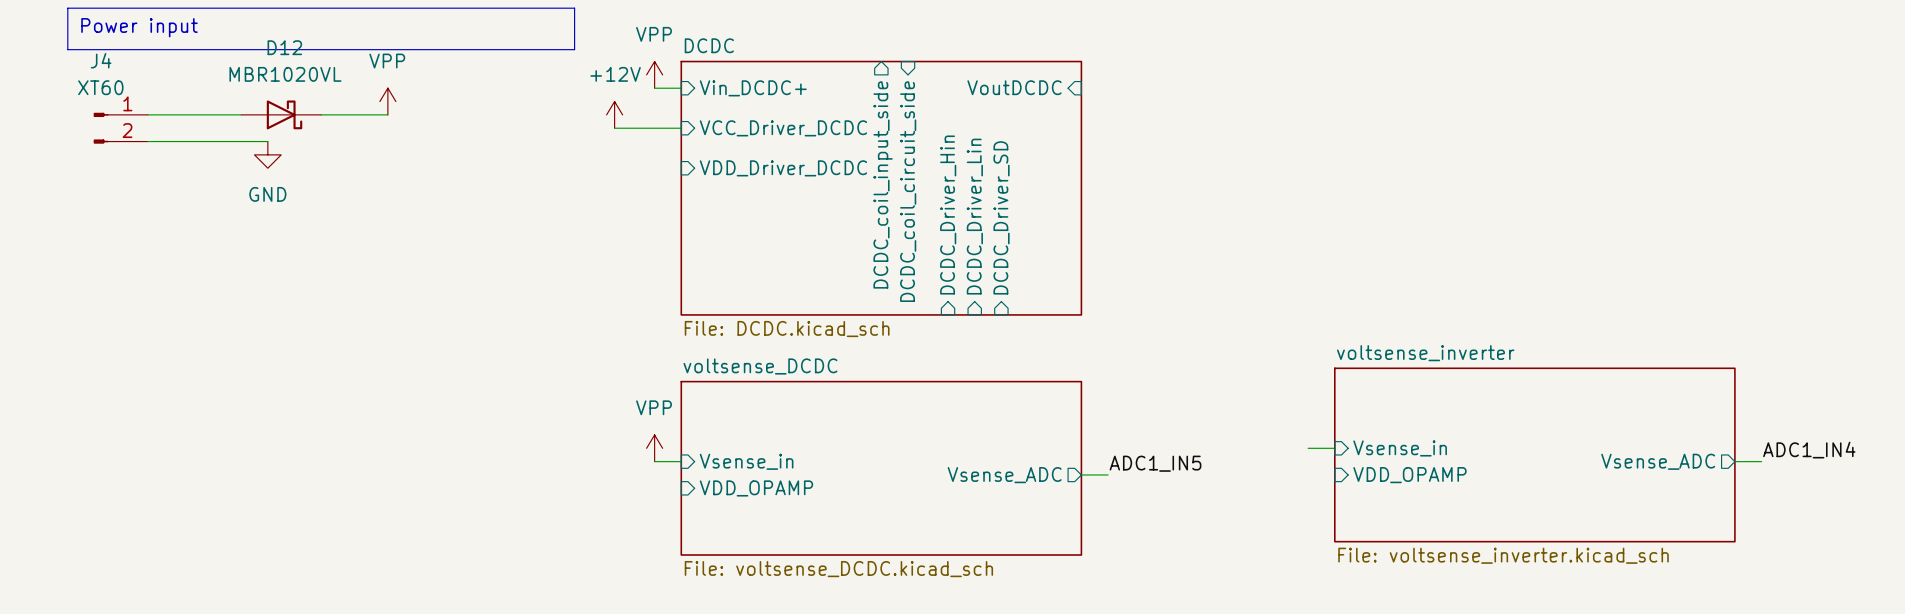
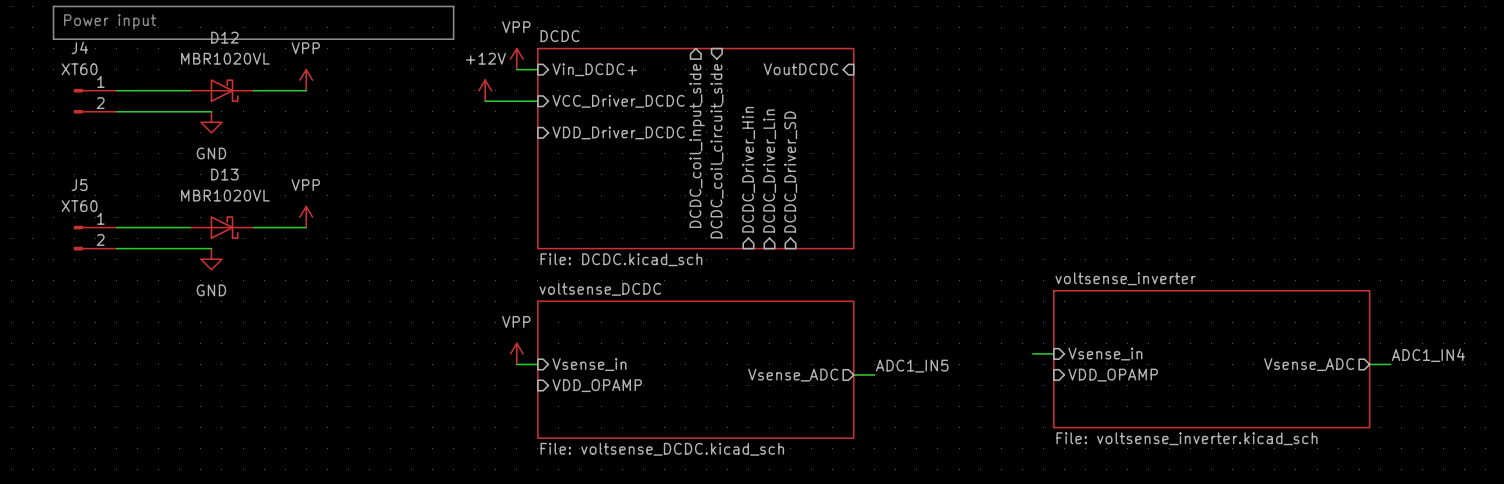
power symbol: none -> VPP (306, 217)
wire: none -> (116, 227) (190, 227)
D13: none -> MBR1020VL (221, 227)
wire: none -> (253, 227) (306, 227)
J5: none -> XT60 (95, 238)
wire: none -> (116, 248) (211, 248)
power symbol: none -> GND (211, 259)

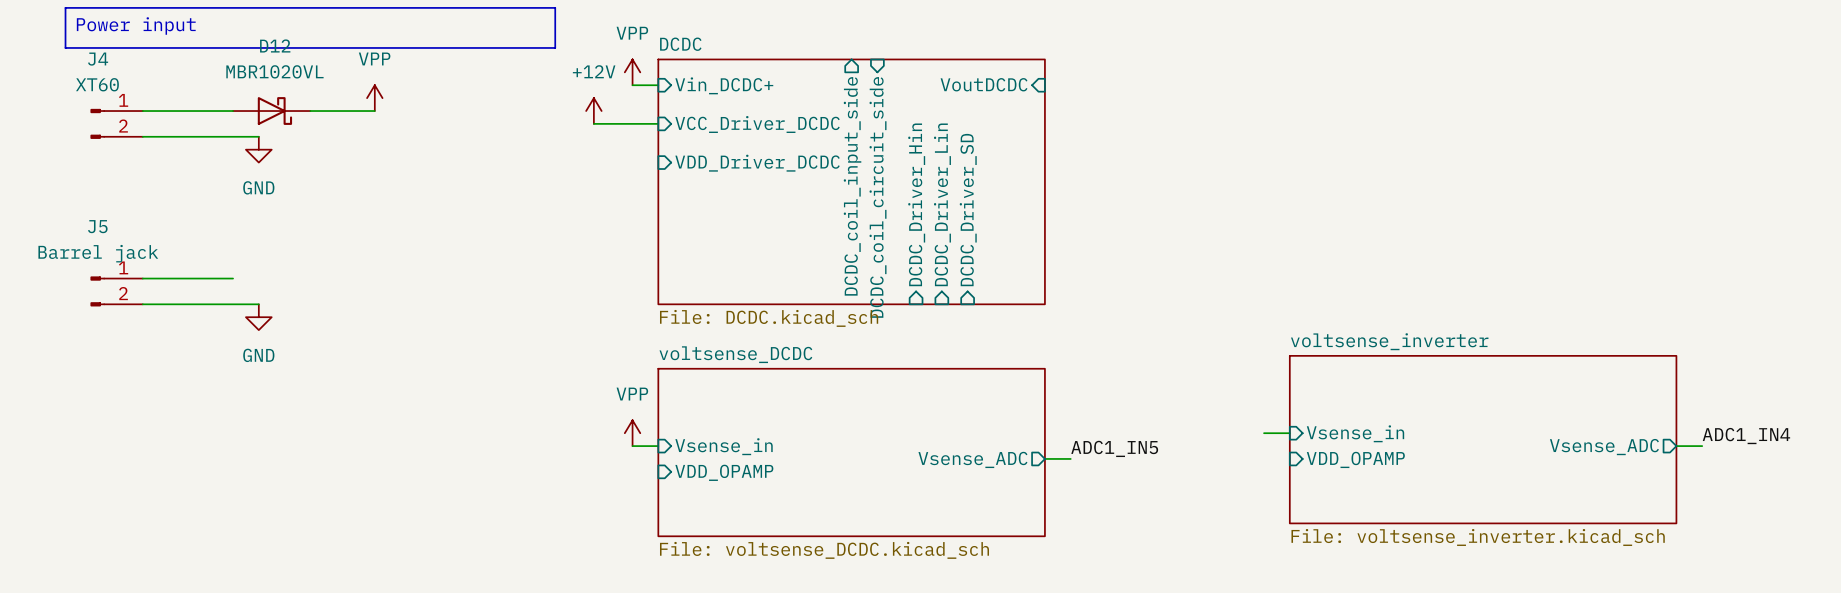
J5 value: XT60 (79, 206) -> Barrel jack (98, 253)
power symbol: VPP (306, 217) -> none
D13: MBR1020VL (221, 227) -> none
wire: (253, 227) (306, 227) -> none

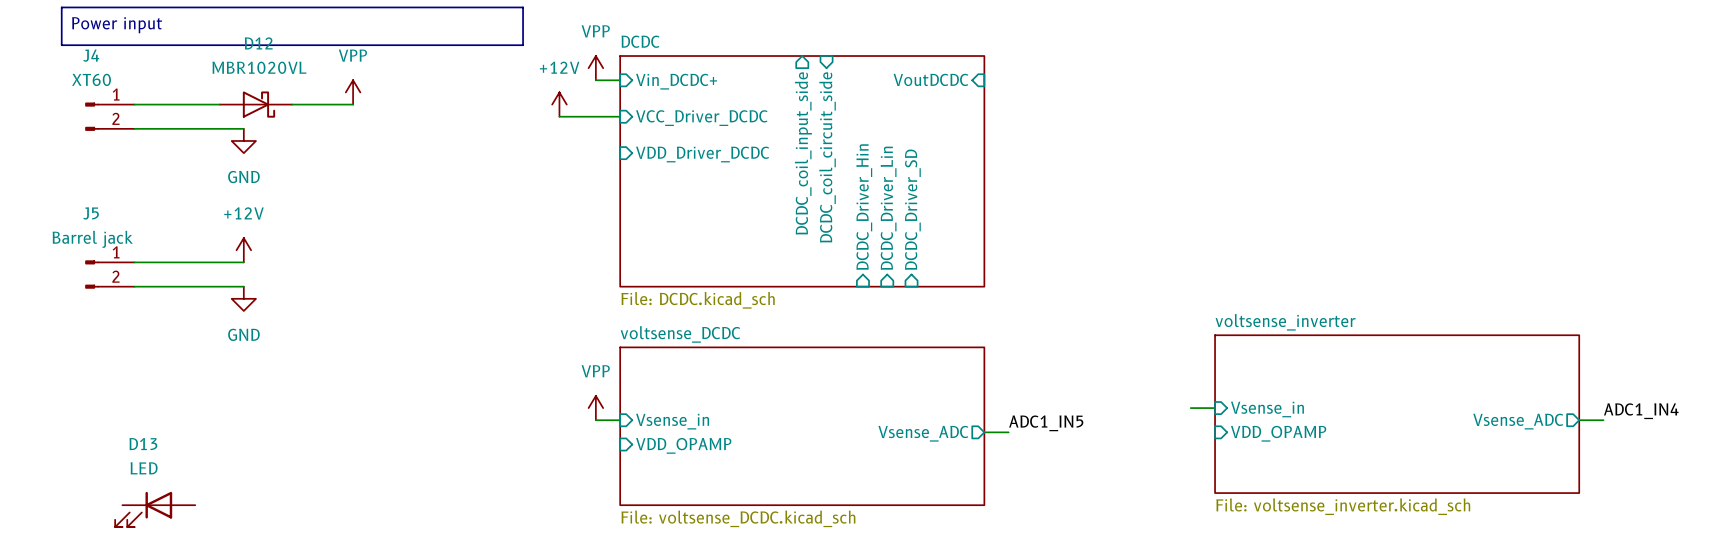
power symbol: none -> +12V (243, 250)
wire: none -> (219, 262) (243, 262)
D13: none -> LED (155, 509)

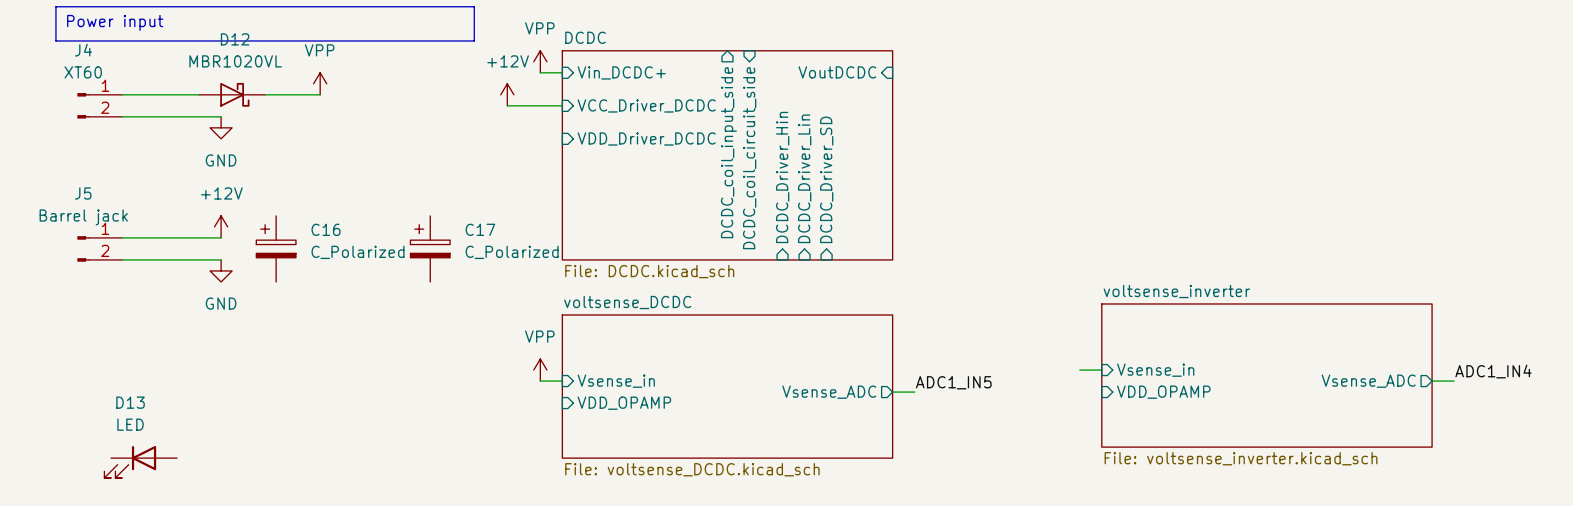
C16: none -> C_Polarized (276, 248)
C17: none -> C_Polarized (430, 248)

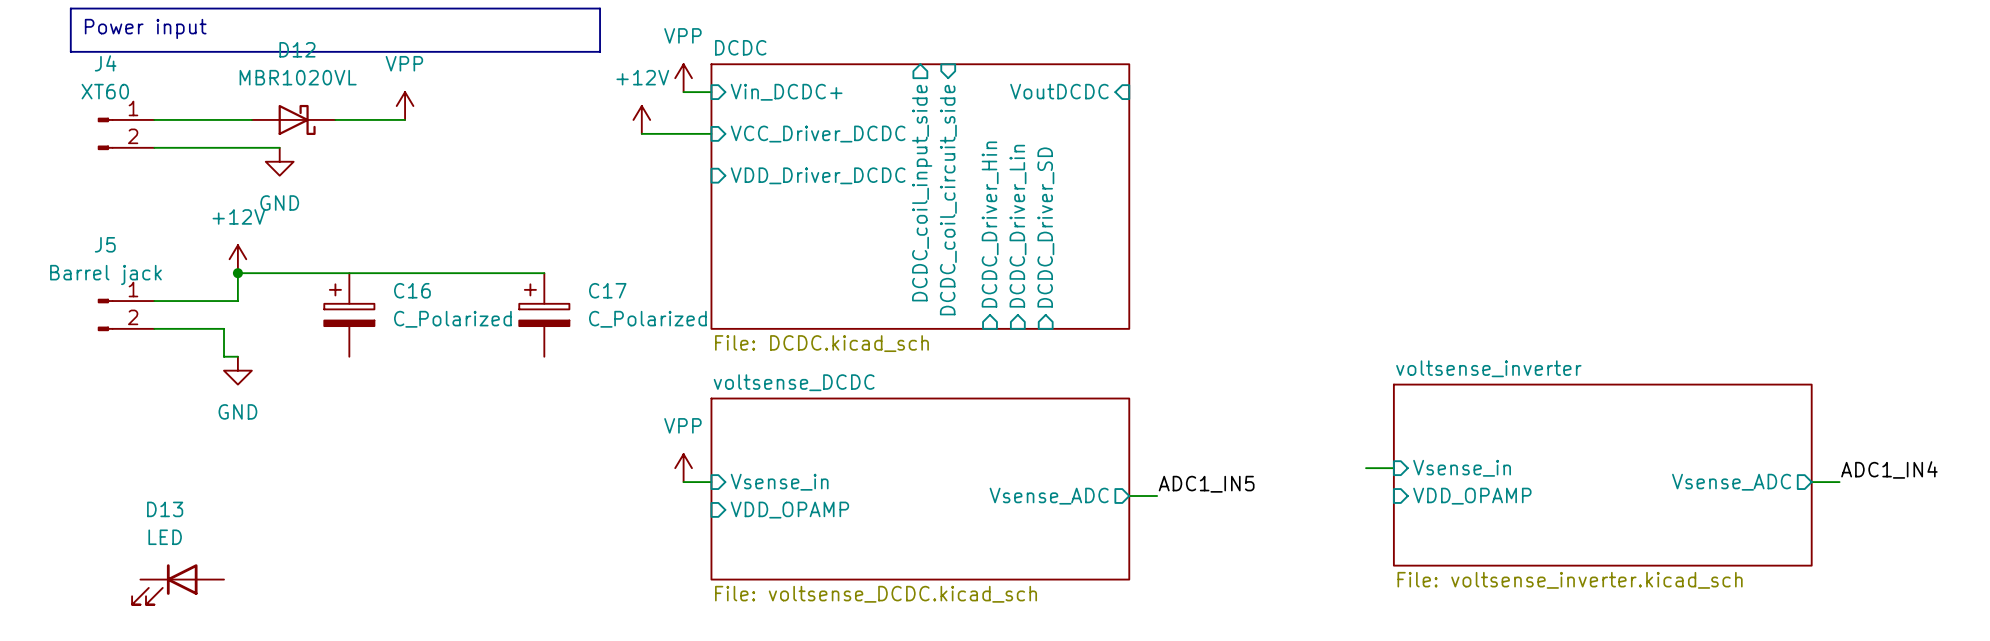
junction: none -> (237, 273)
power symbol position: +12V (221, 226) -> +12V (237, 259)
wire: (188, 237) (221, 237) -> (237, 301) (237, 273) (544, 273)
wire: (177, 259) (221, 259) -> (224, 328) (224, 356) (237, 356)
power symbol position: GND (221, 270) -> GND (237, 370)

